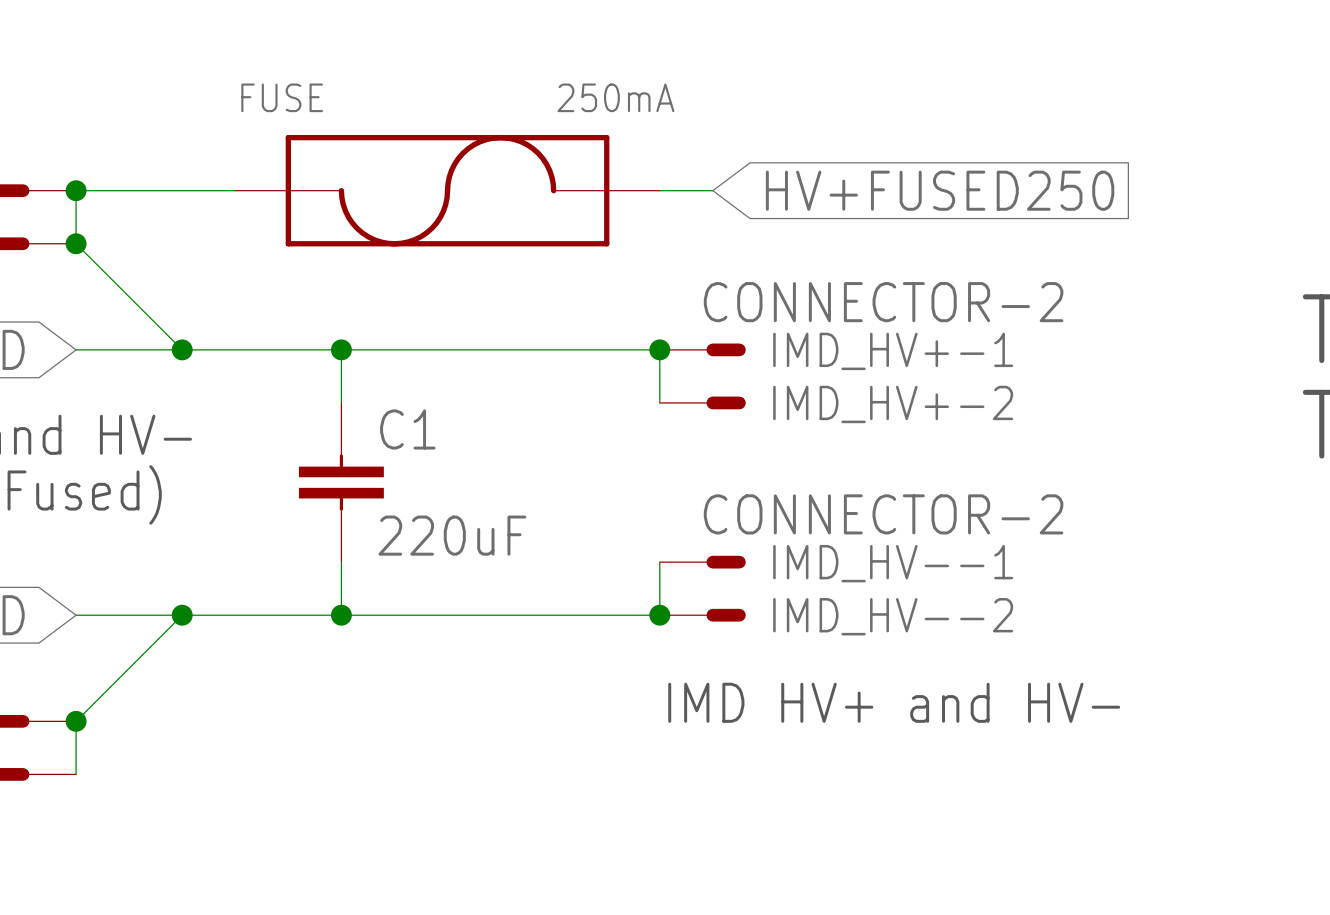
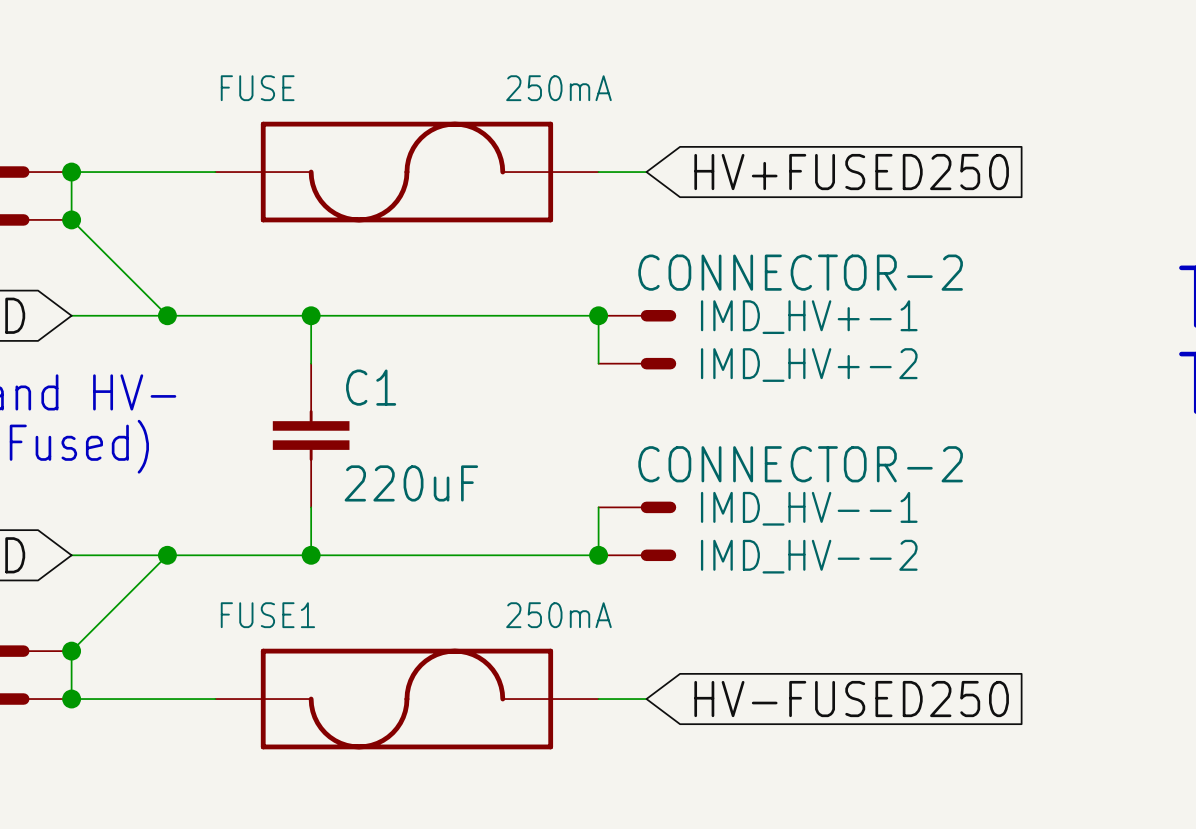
text: IMD HV+ and HV- (894, 702) -> none
wire: none -> (71, 699) (215, 699)
junction: none -> (71, 699)
FUSE1: none -> 250mA (406, 699)
wire: none -> (598, 699) (646, 699)
global label: none -> HV-FUSED250 (851, 699)

